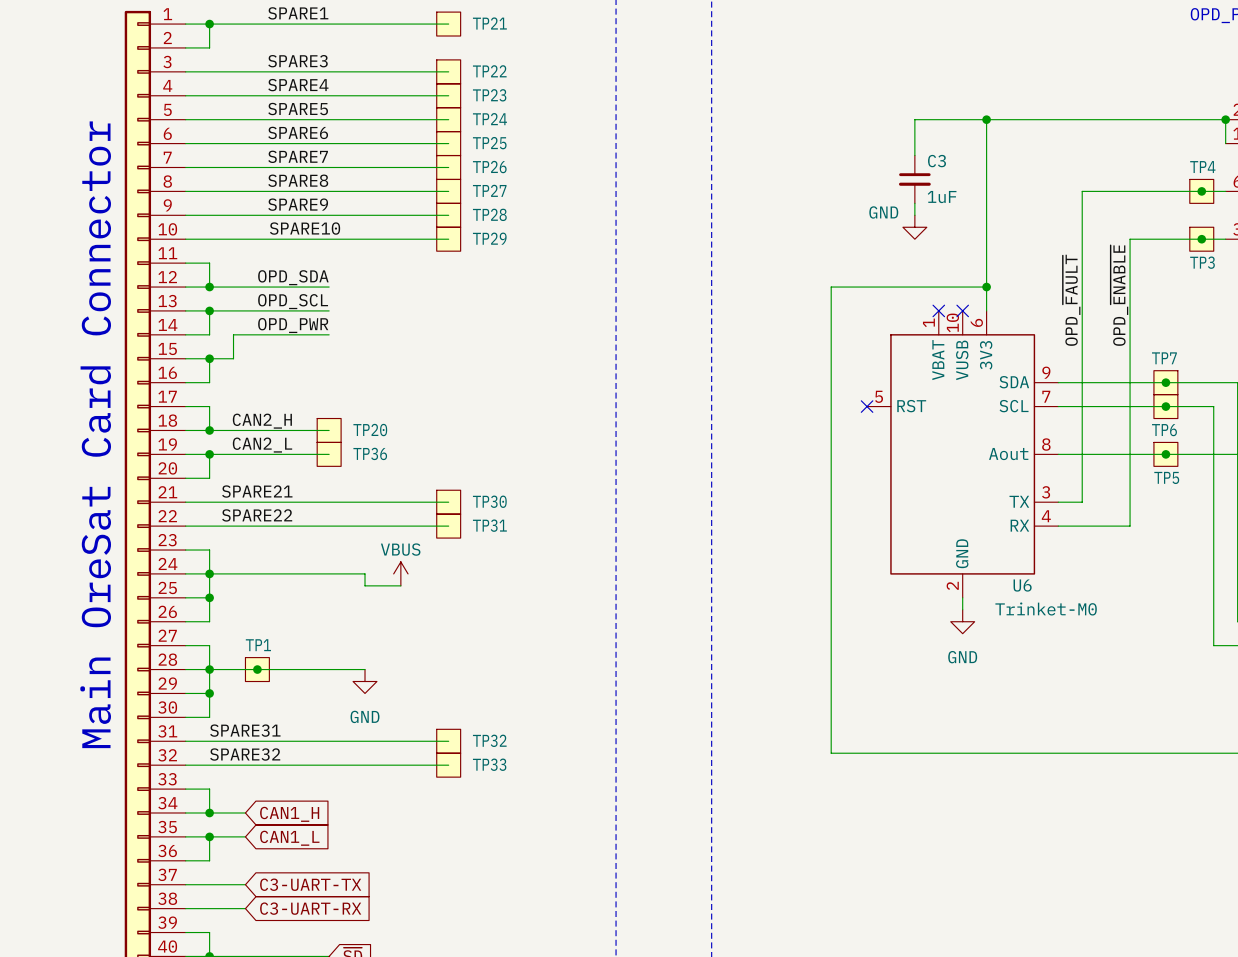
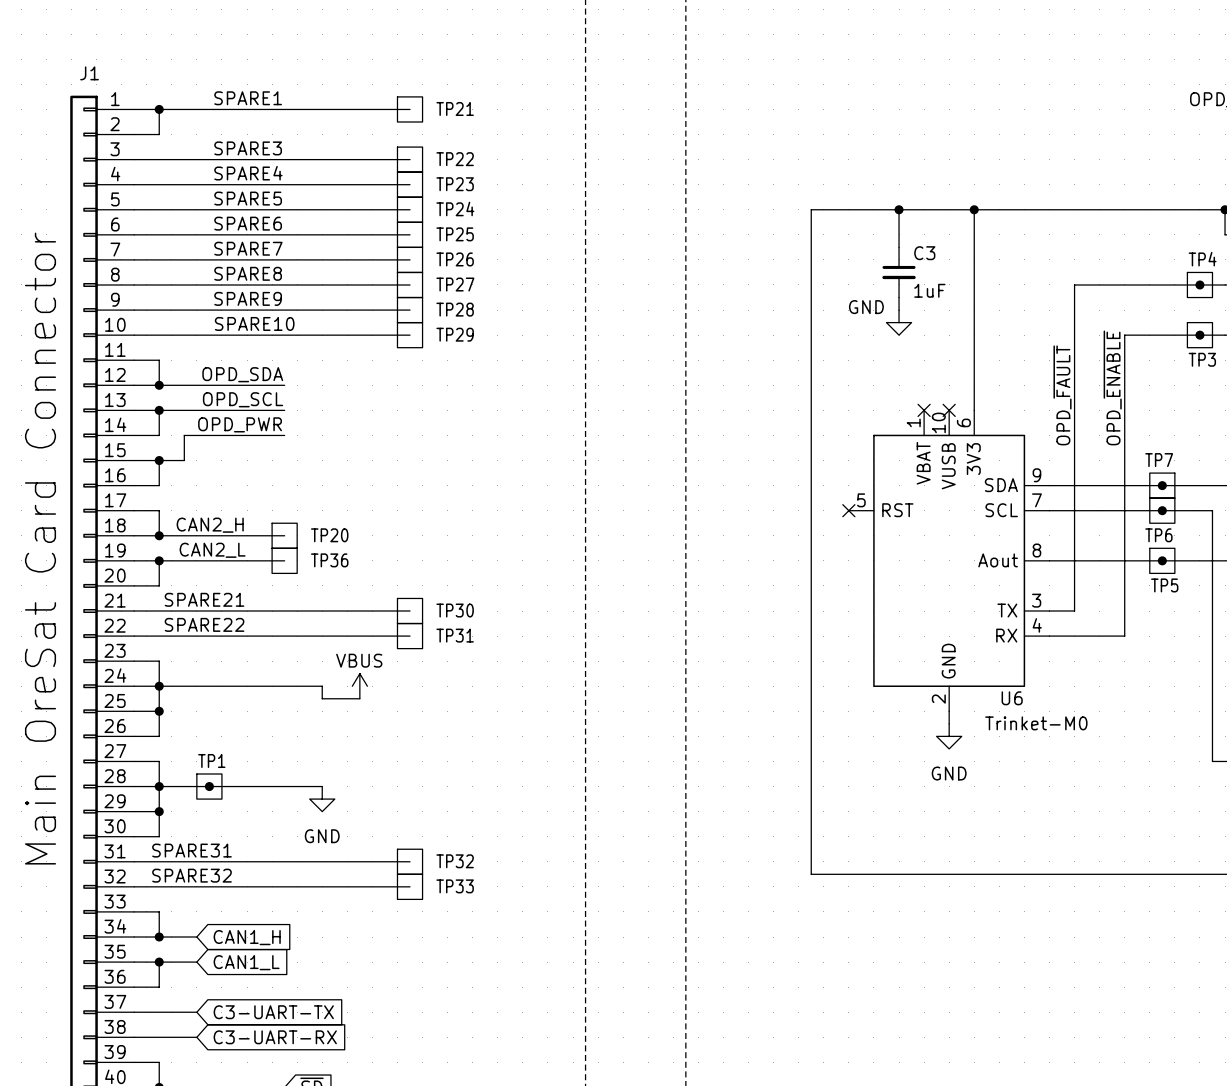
junction: none -> (899, 209)
wire: (831, 287) (986, 287) -> (811, 385) (811, 209) (899, 209)
junction: (986, 287) -> none

